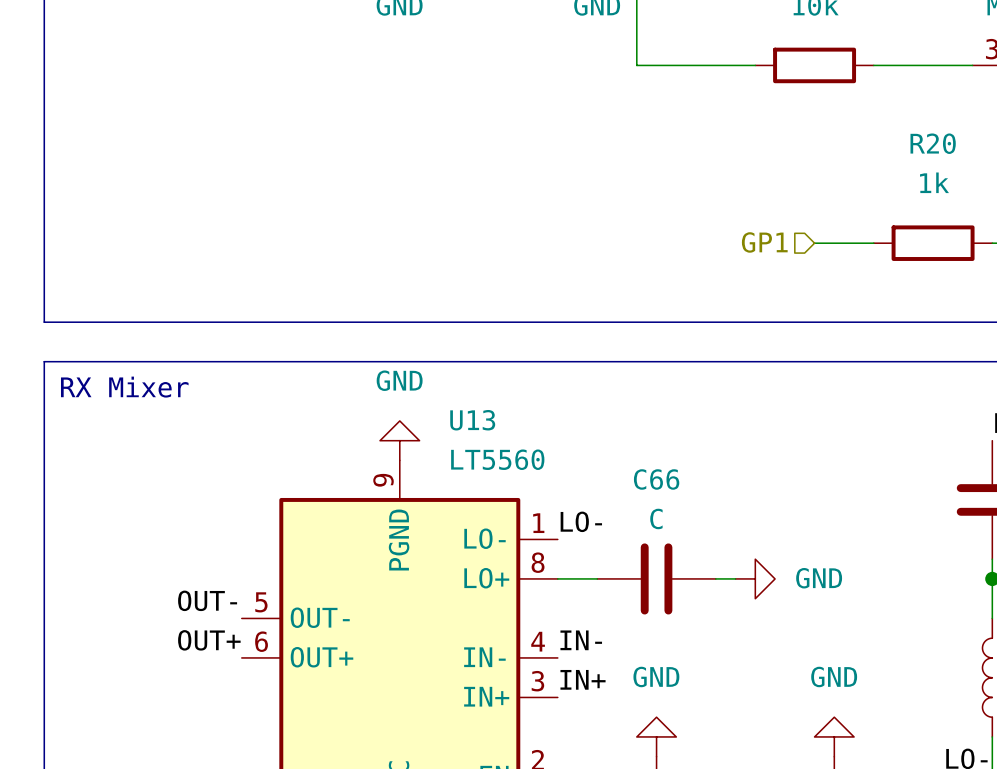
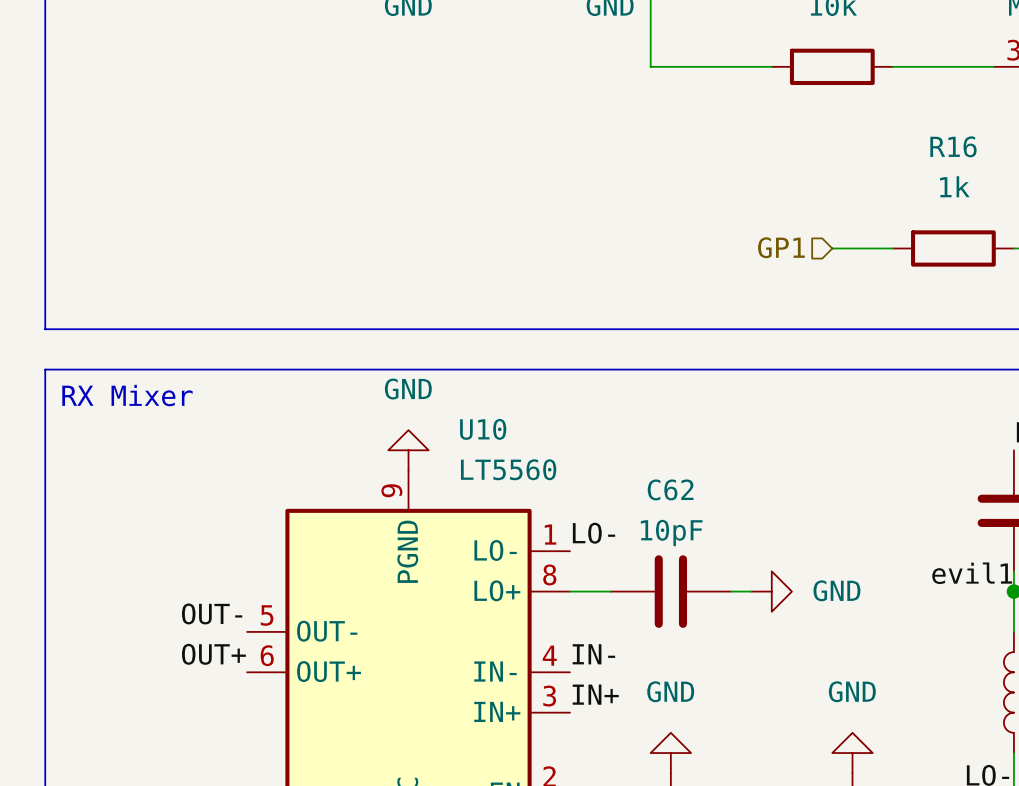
R20 name: R20 (933, 143) -> R16 (953, 146)
U13 name: U13 (472, 420) -> U10 (483, 429)
C66 name: C66 (656, 479) -> C62 (670, 489)
C66 value: C (656, 518) -> 10pF (671, 532)
label: none -> evil1 (972, 573)

